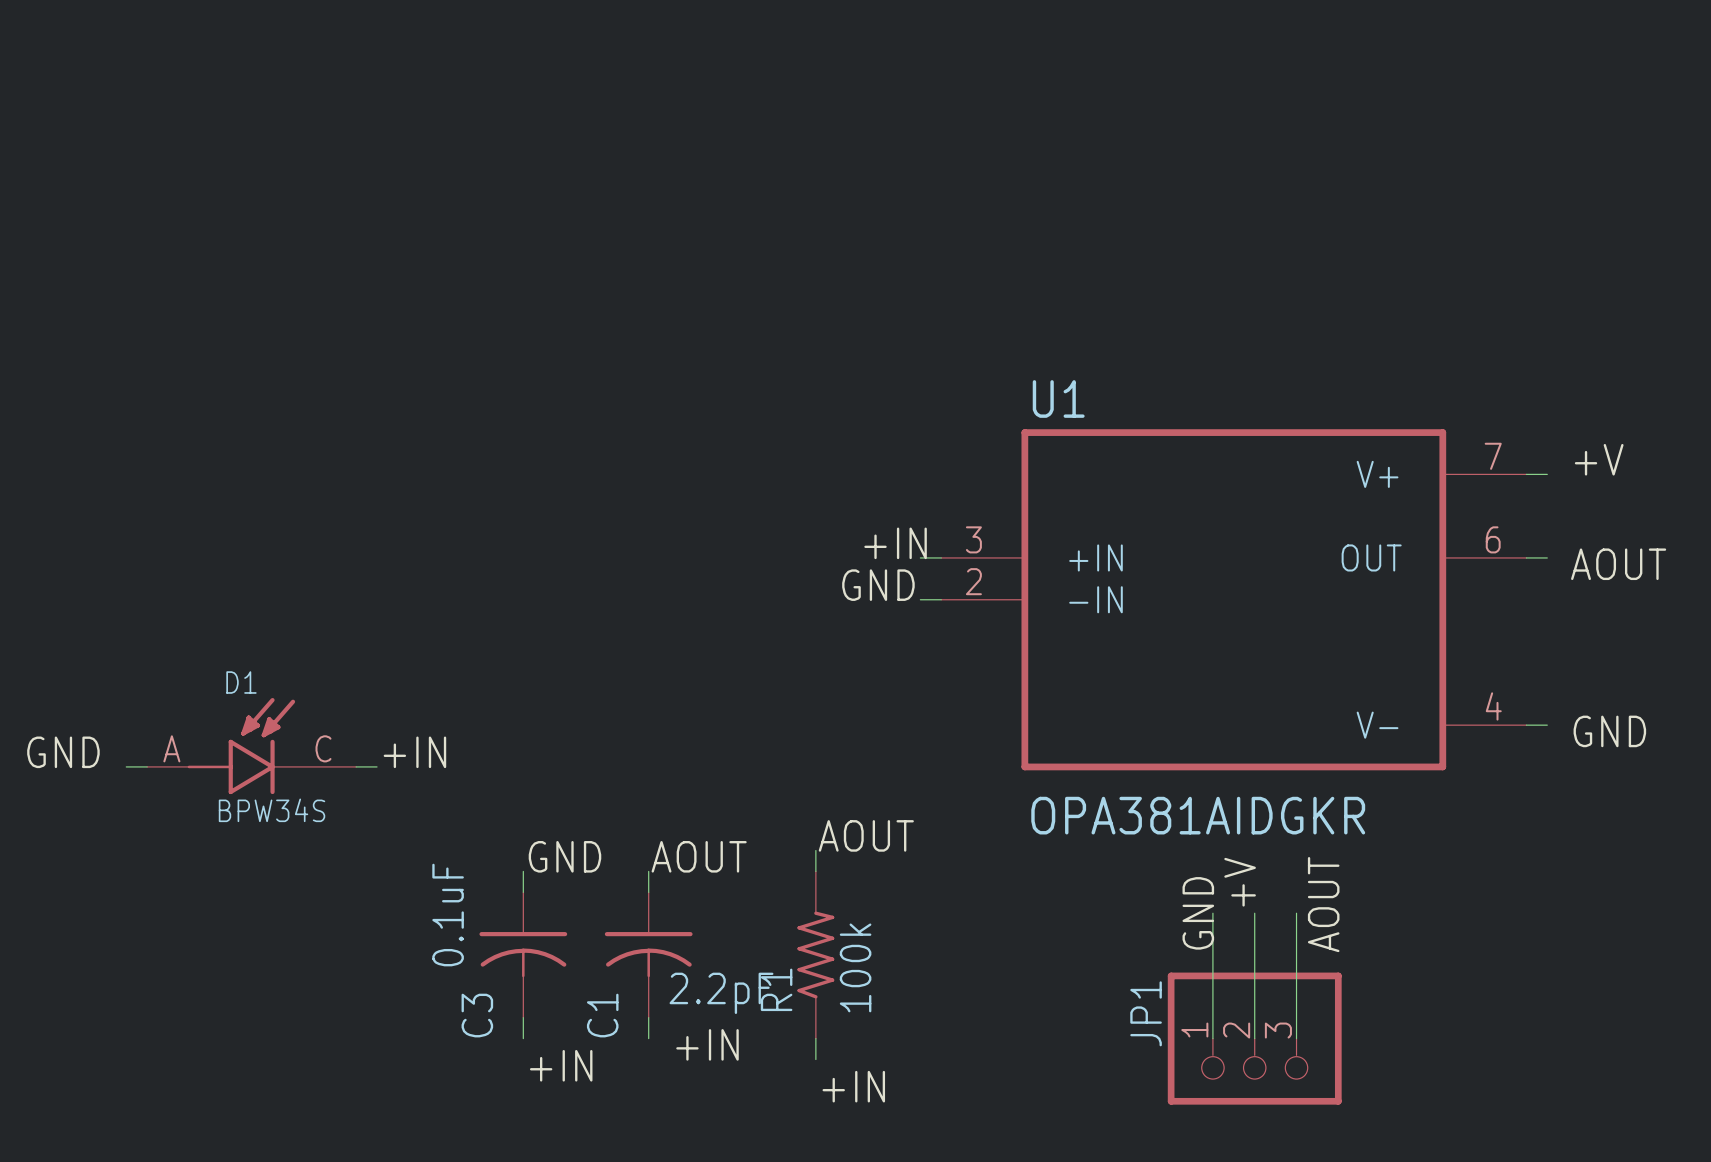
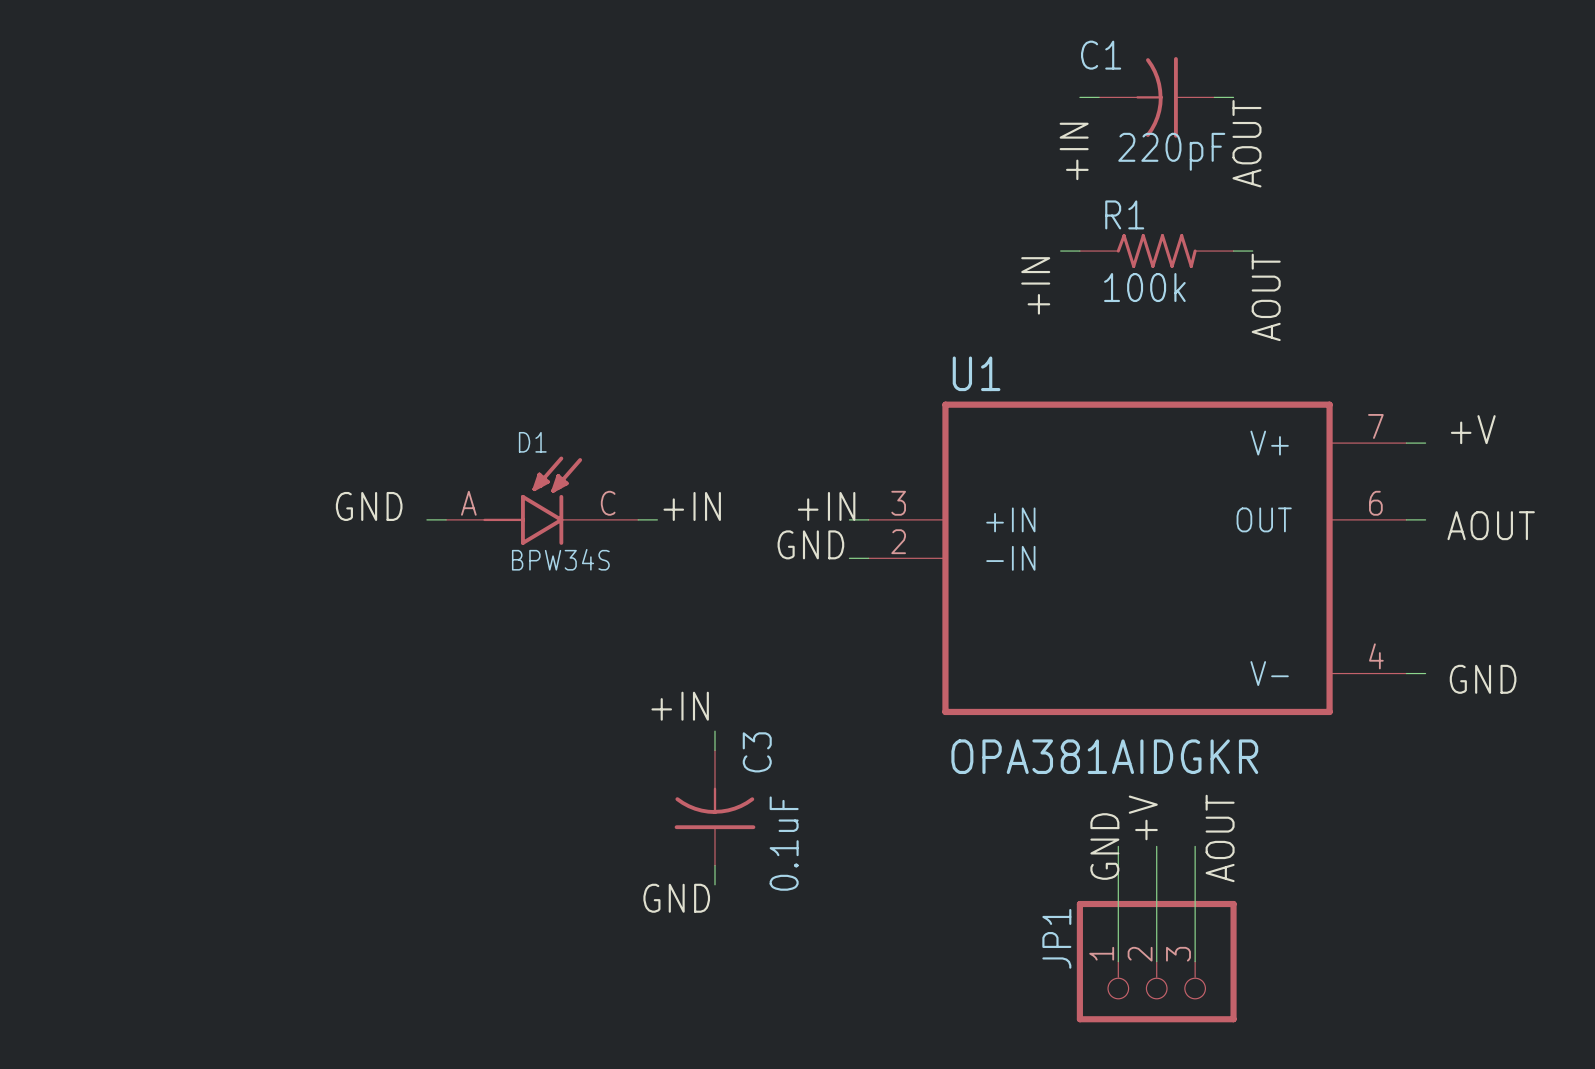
wire: none -> (1079, 97) (1099, 97)
wire: none -> (1214, 97) (1233, 97)
label: none -> AOUT (1246, 143)
label: none -> +IN (1074, 151)
wire: none -> (1060, 251) (1079, 251)
wire: none -> (1233, 251) (1252, 251)
label: none -> +IN (1035, 285)
label: none -> AOUT (1266, 297)
label: none -> GND (369, 506)
label: none -> +IN (692, 506)
D1 position: (251, 746) -> (542, 500)
label: GND (63, 752) -> none
label: +IN (414, 752) -> none
label: none -> +IN (680, 706)
wire: (126, 766) (147, 766) -> (426, 519) (446, 519)
wire: (356, 766) (377, 766) -> (638, 519) (657, 519)
label: AOUT (866, 835) -> none
wire: (815, 850) (815, 871) -> none
label: GND (564, 856) -> none
label: AOUT (699, 856) -> none
wire: (523, 871) (523, 892) -> none
wire: (648, 871) (648, 892) -> (714, 731) (714, 750)
C3 rotation: 0° (523, 954) -> 180° (714, 808)
C1 rotation: 0° (648, 954) -> 90° clockwise (1157, 97)
C3 position: (523, 955) -> (714, 807)
C1 position: (648, 955) -> (1156, 97)
R1 rotation: 0° (815, 955) -> 90° clockwise (1156, 251)
R1 position: (815, 955) -> (1156, 251)
label: none -> GND (676, 898)
C1 value: 2.2pF (721, 993) -> 220pF (1171, 151)
wire: (523, 1017) (523, 1038) -> none
wire: (648, 1017) (648, 1038) -> (714, 865) (714, 884)
wire: (815, 1038) (815, 1059) -> none
label: +IN (707, 1044) -> none
label: +IN (561, 1065) -> none
label: +IN (853, 1086) -> none

